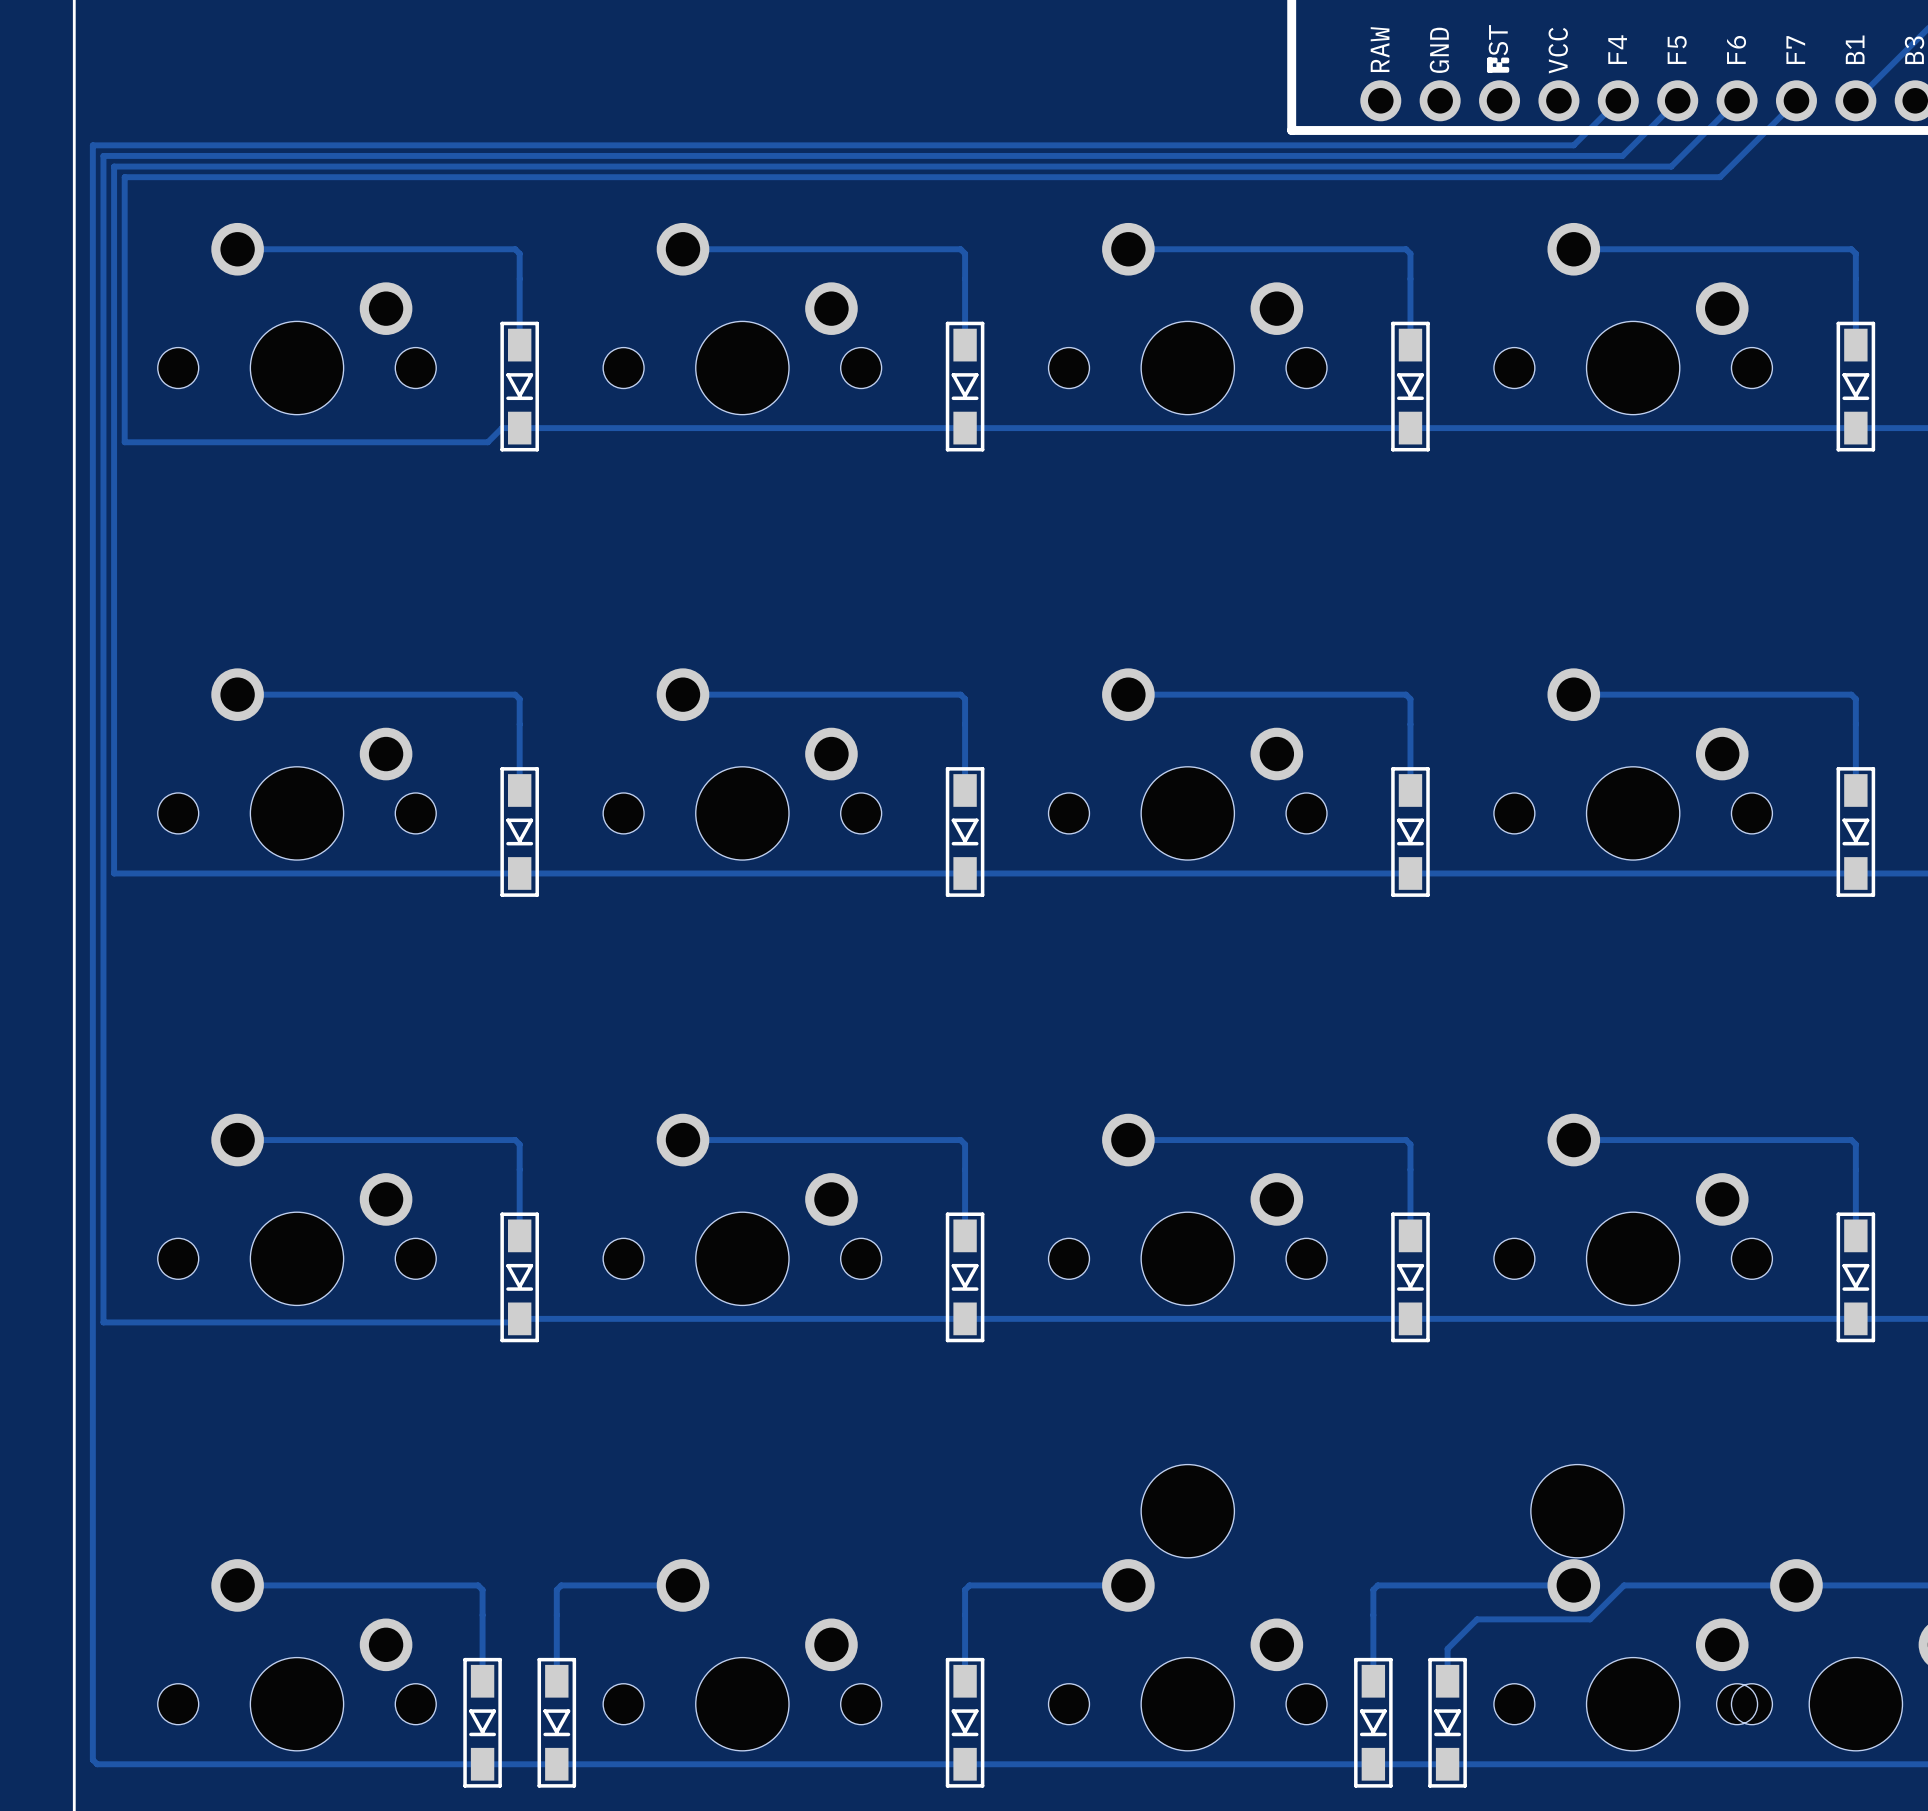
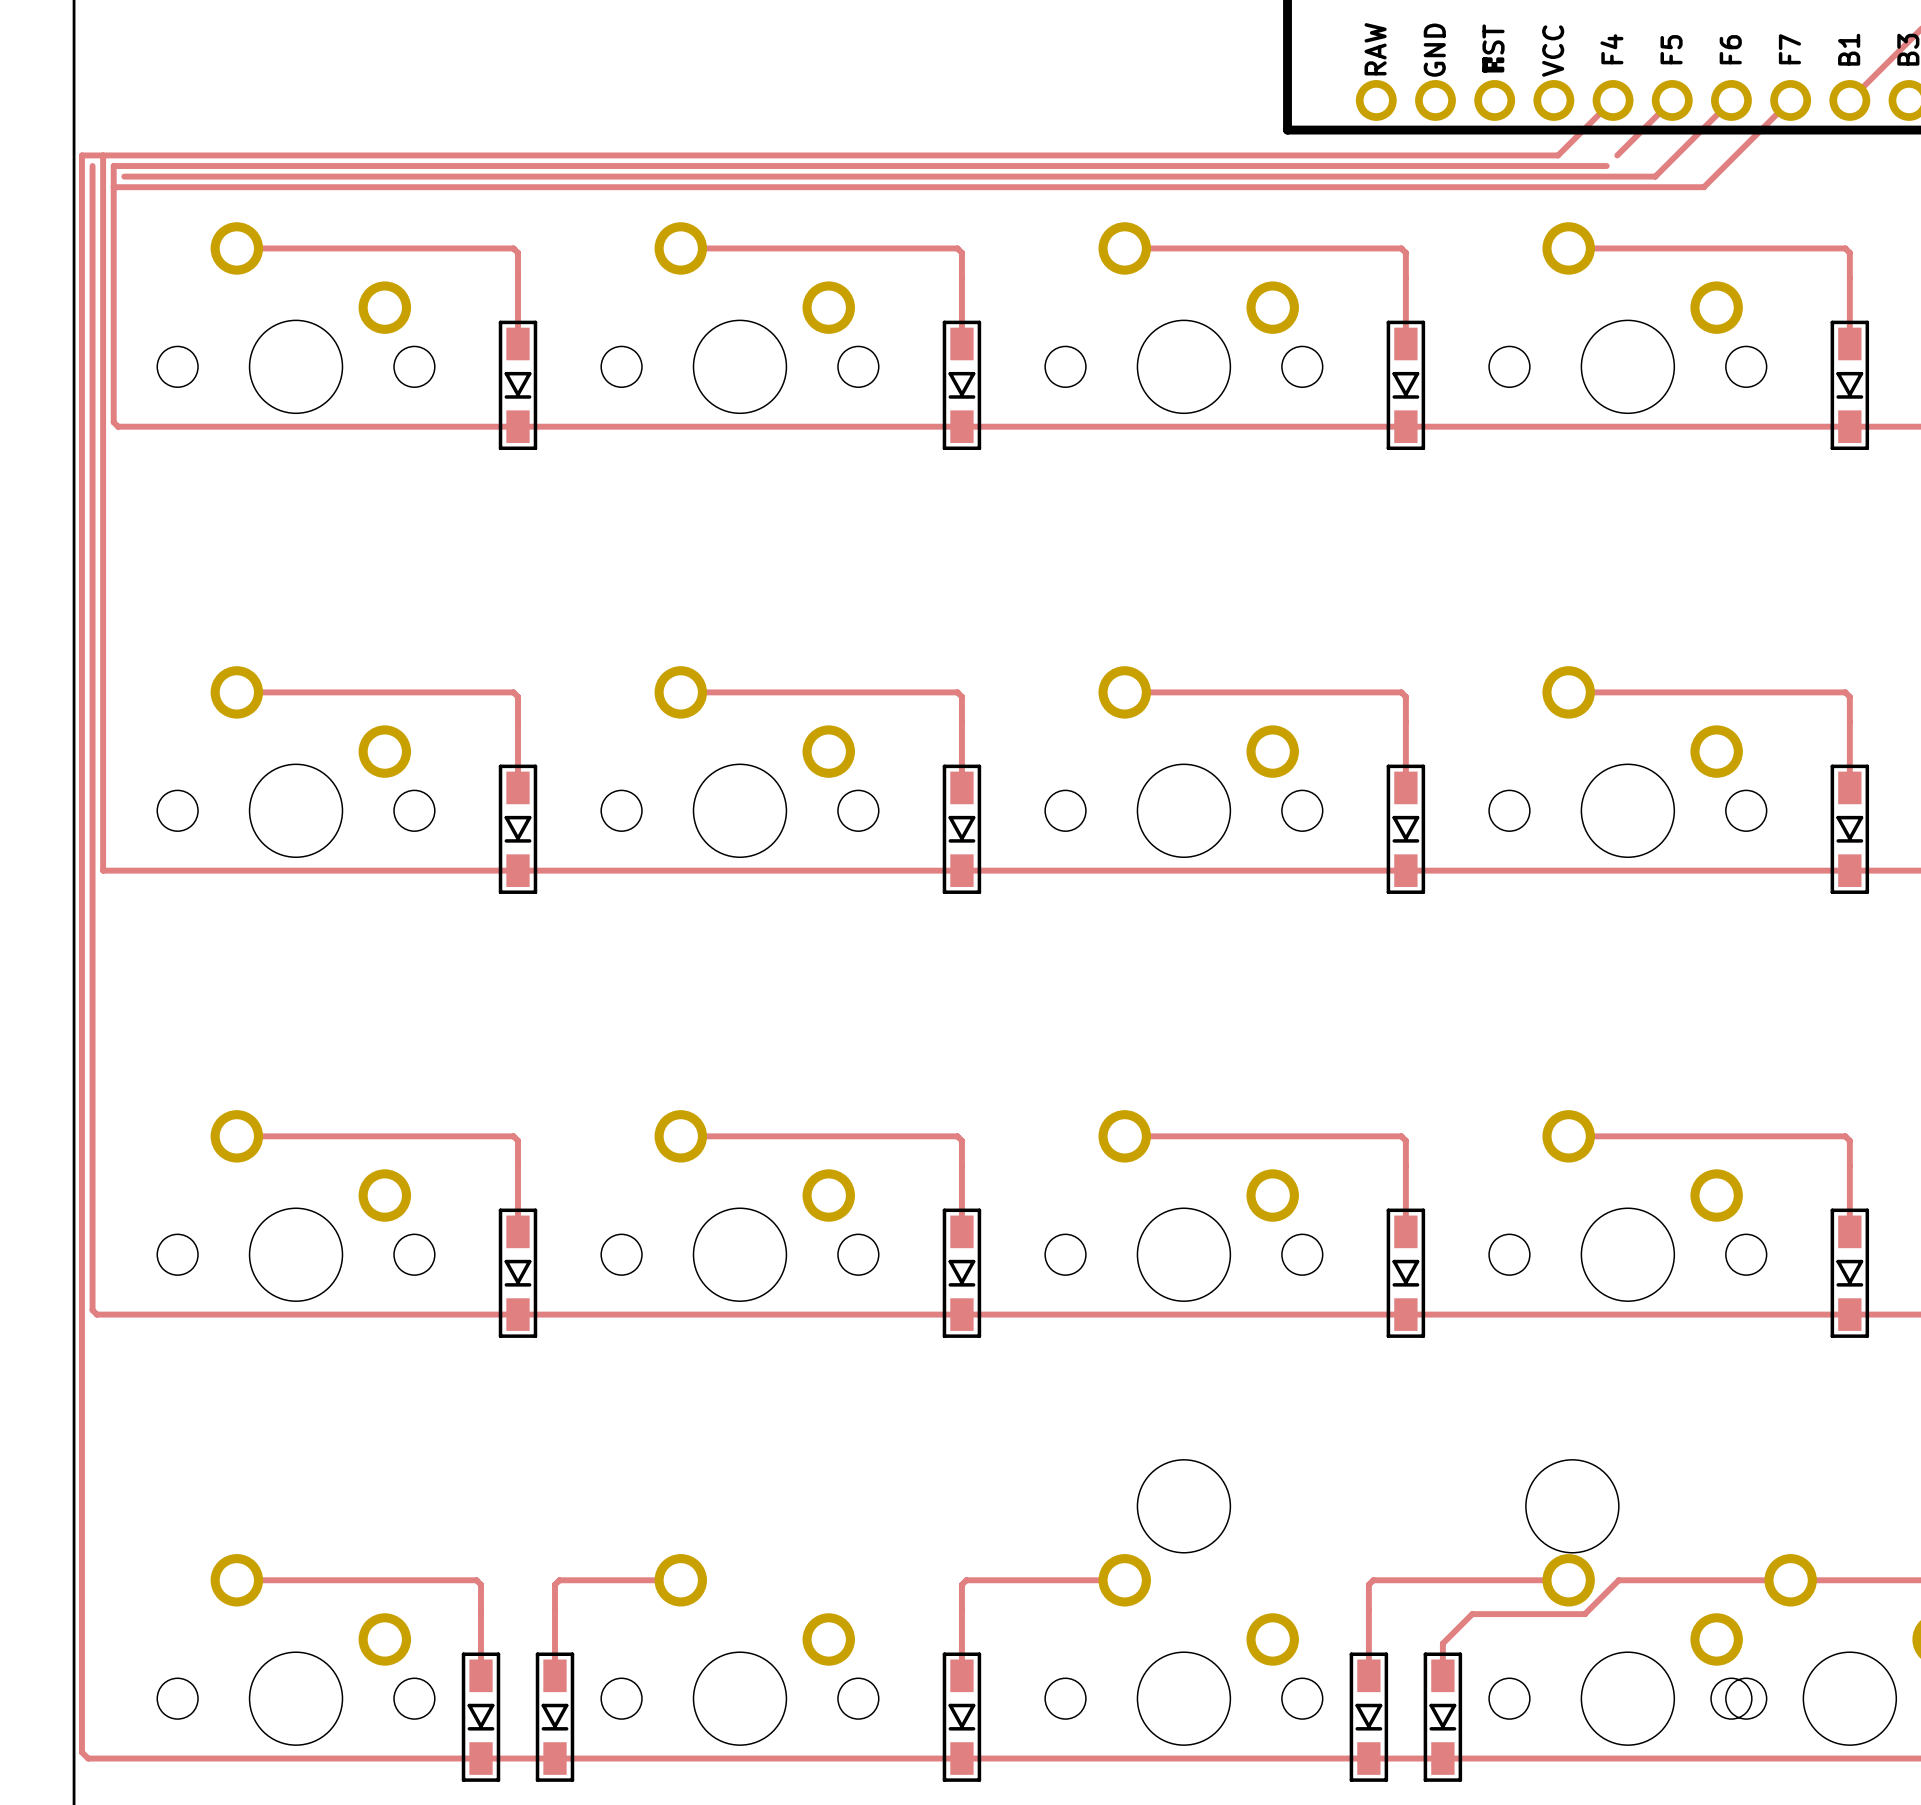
track: (1573, 145) (92, 145) (92, 166) -> none
track: none -> (103, 155) (81, 155) (81, 1752) (88, 1758) (96, 1758)
track: (1563, 155) (1622, 155) -> (1558, 155) (1568, 144)
track: (1611, 166) (1671, 166) -> (1655, 176) (1665, 166)
track: (124, 177) (124, 442) (487, 442) (502, 428) -> (113, 422) (118, 426) (500, 426)
track: (1660, 177) (1720, 177) -> (113, 187) (1703, 187) (1714, 176)
track: (114, 423) (114, 873) -> (103, 870) (113, 870)
track: (103, 873) (103, 1322) (516, 1322) -> none
track: (92, 1314) (92, 1759) (97, 1764) -> (92, 1310) (96, 1314) (518, 1314)

